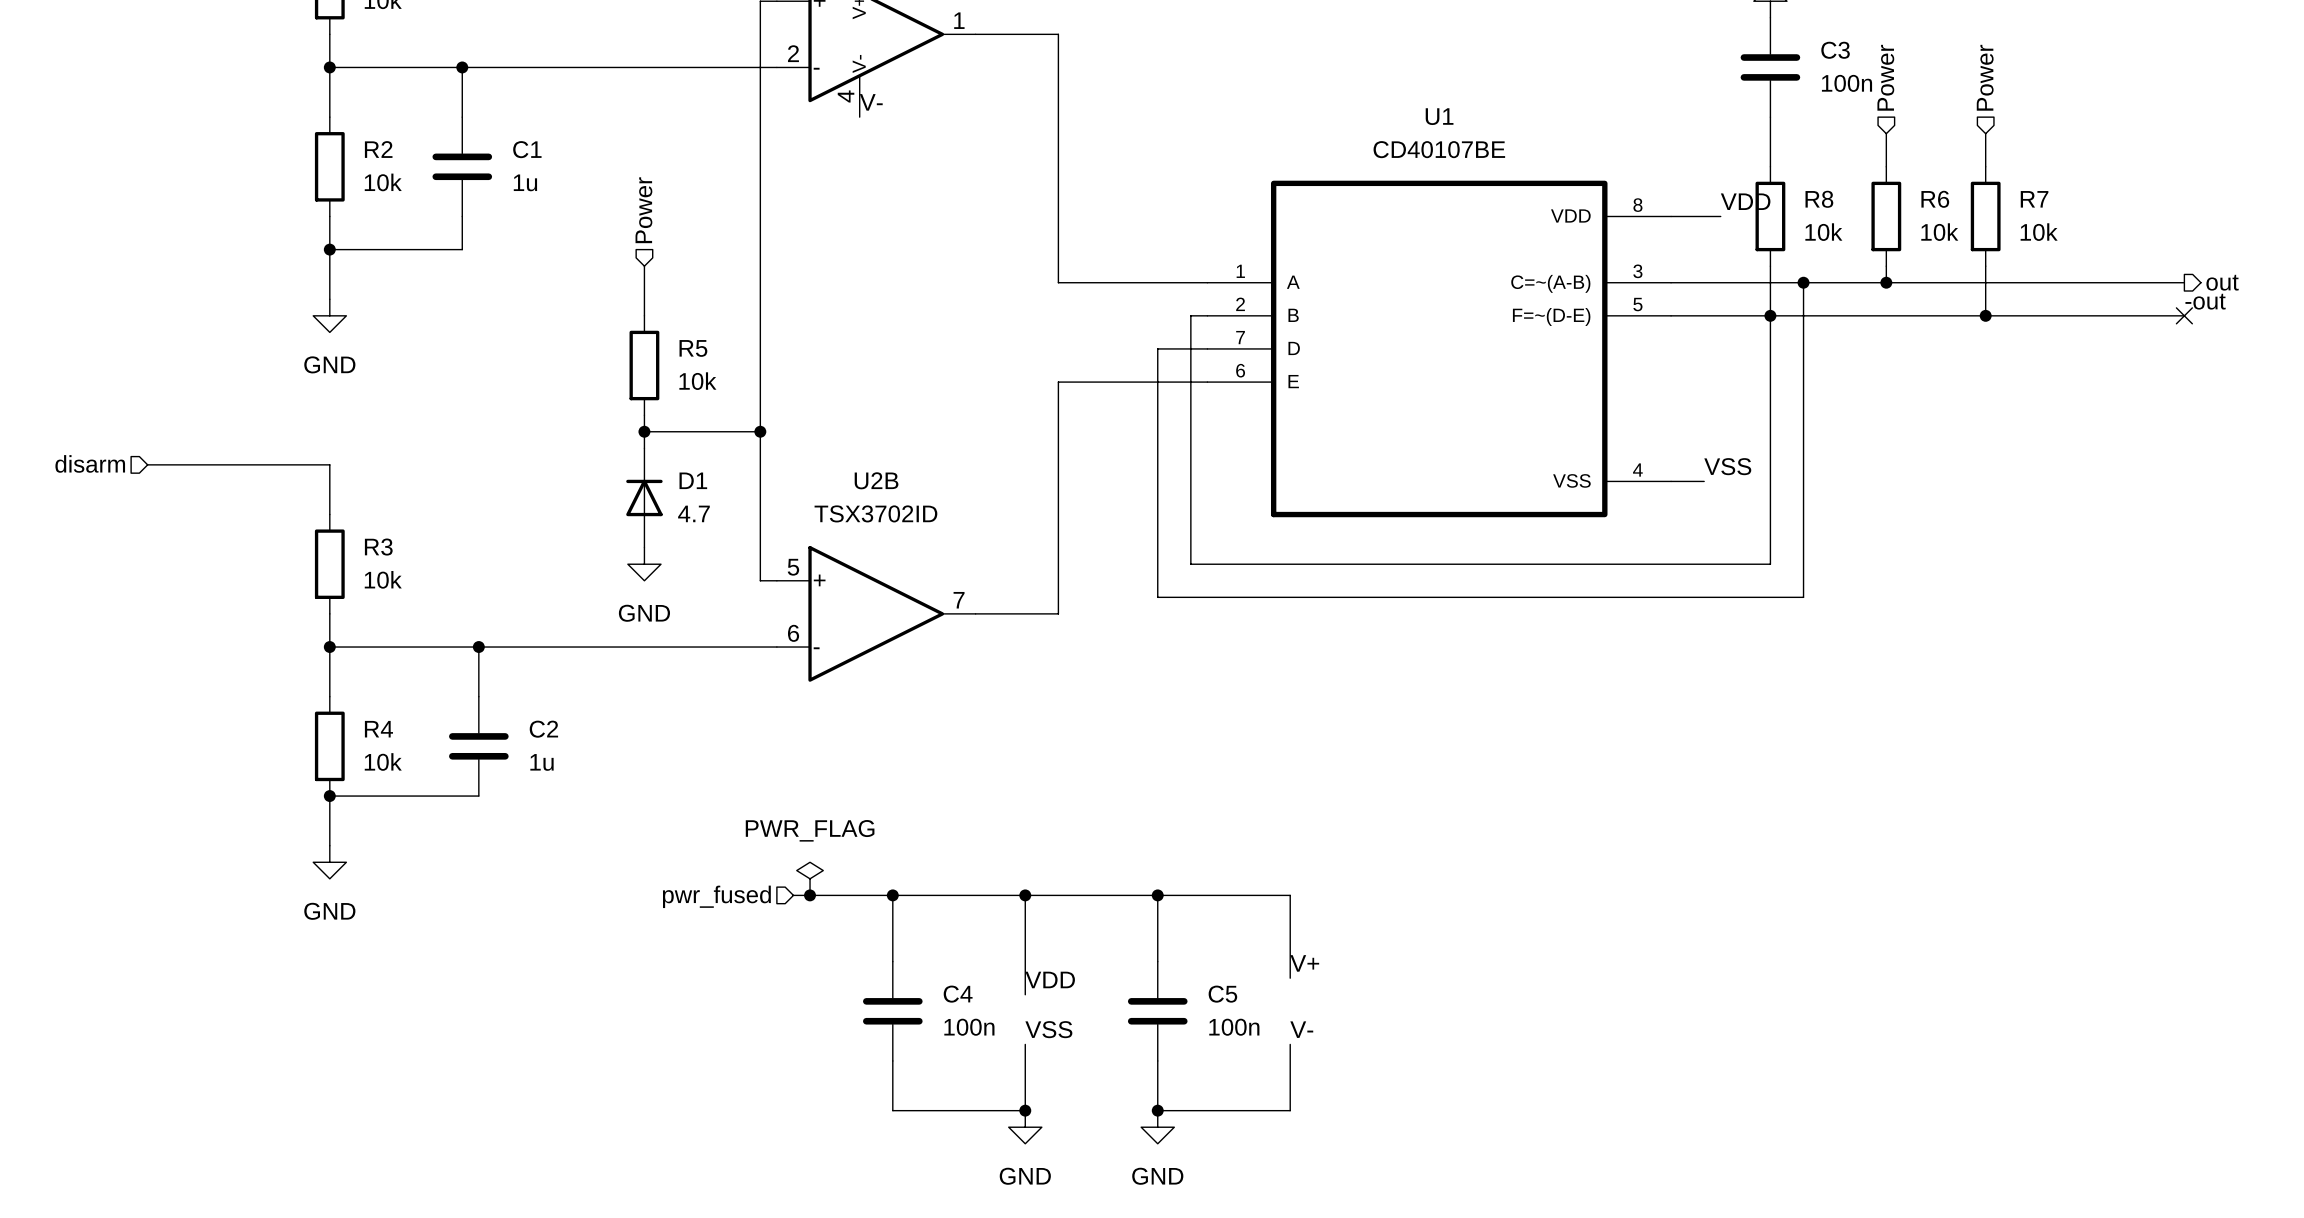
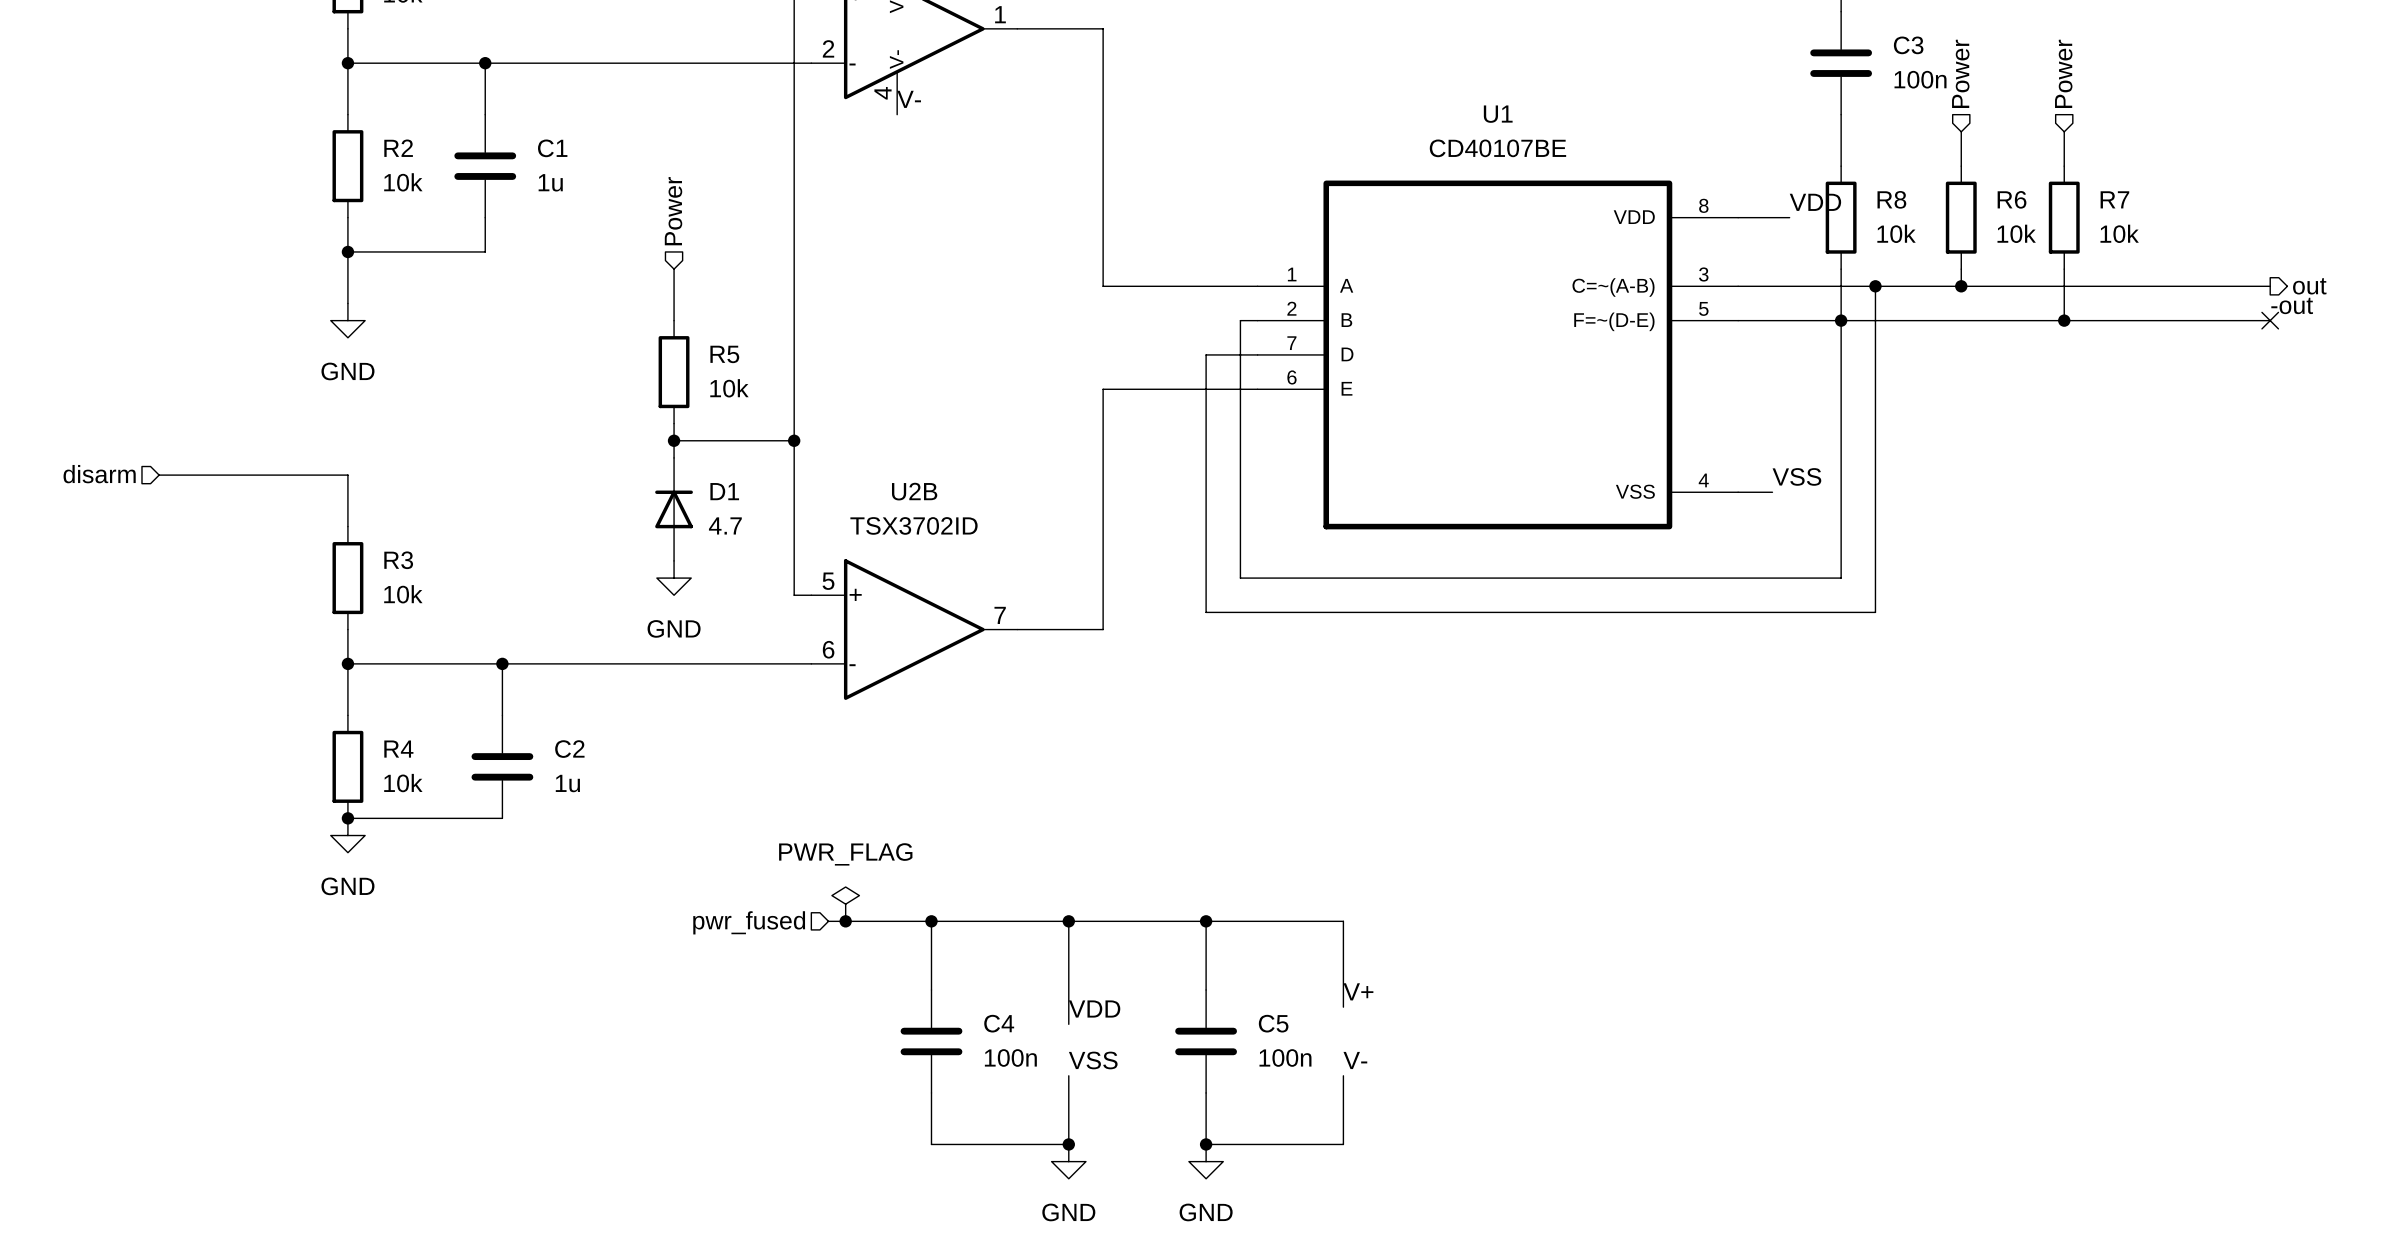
wire: (329, 796) (329, 845) -> none
power symbol position: GND (329, 862) -> GND (347, 835)

